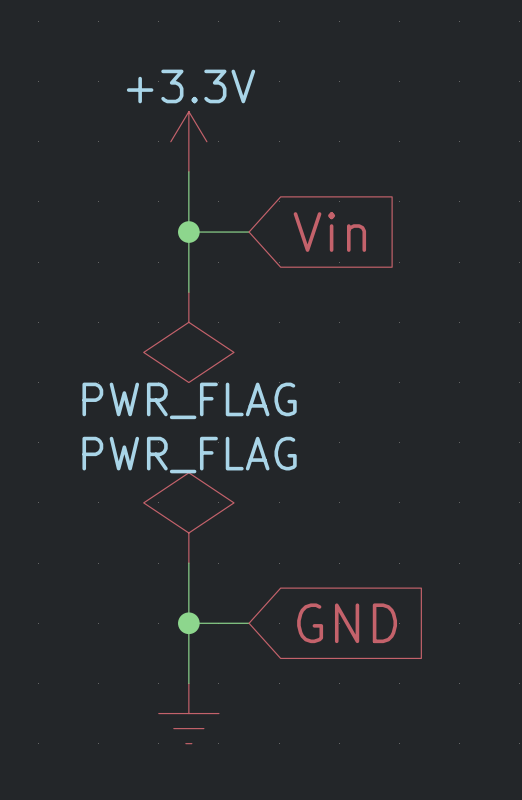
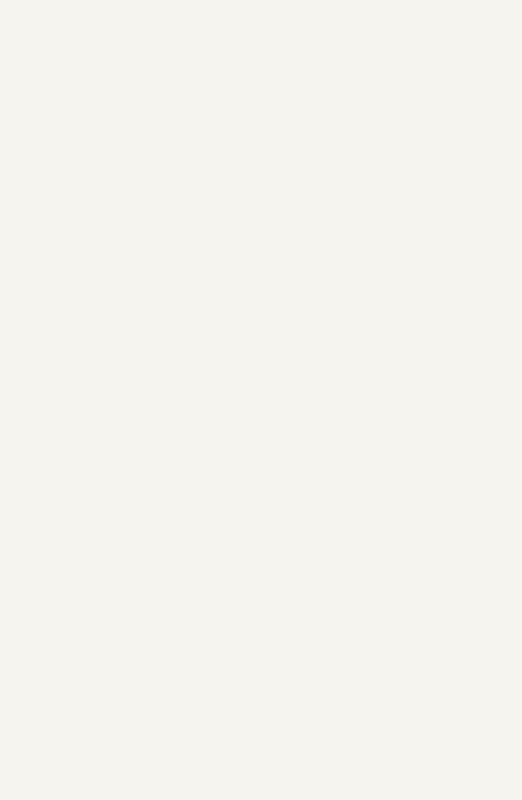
power symbol: +3.3V (188, 141) -> none
wire: (188, 171) (188, 292) -> none
wire: (188, 232) (249, 232) -> none
junction: (188, 232) -> none
global label: Vin (329, 232) -> none
power symbol: PWR_FLAG (188, 337) -> none
power symbol: PWR_FLAG (188, 517) -> none
wire: (188, 563) (188, 683) -> none
wire: (188, 623) (249, 623) -> none
junction: (188, 623) -> none
global label: GND (347, 623) -> none
power symbol: (188, 713) -> none

